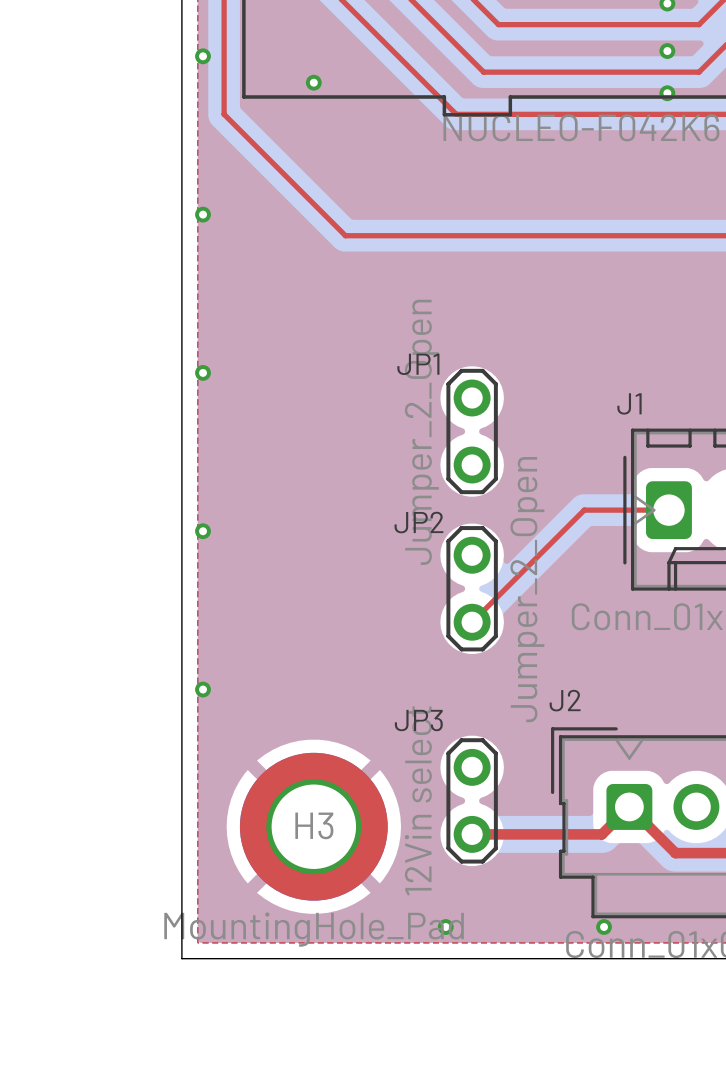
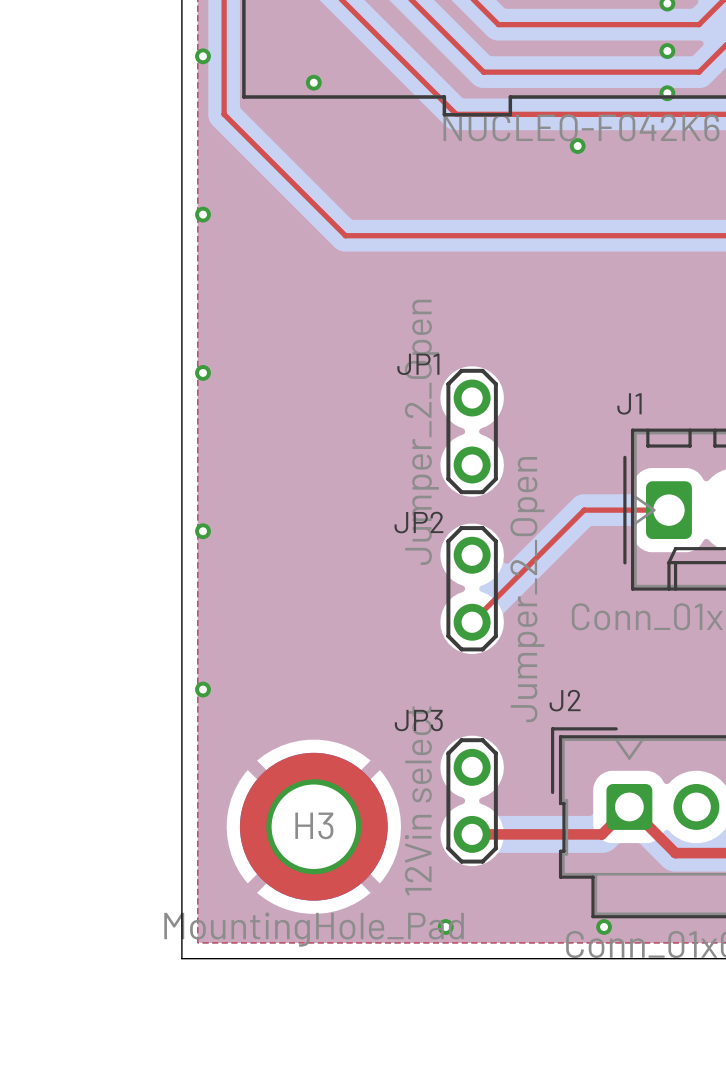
via: none -> (577, 146)

